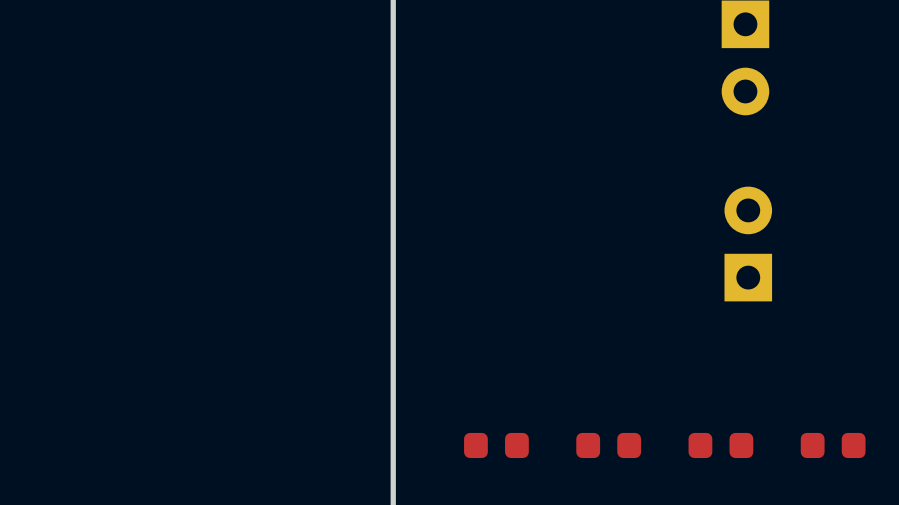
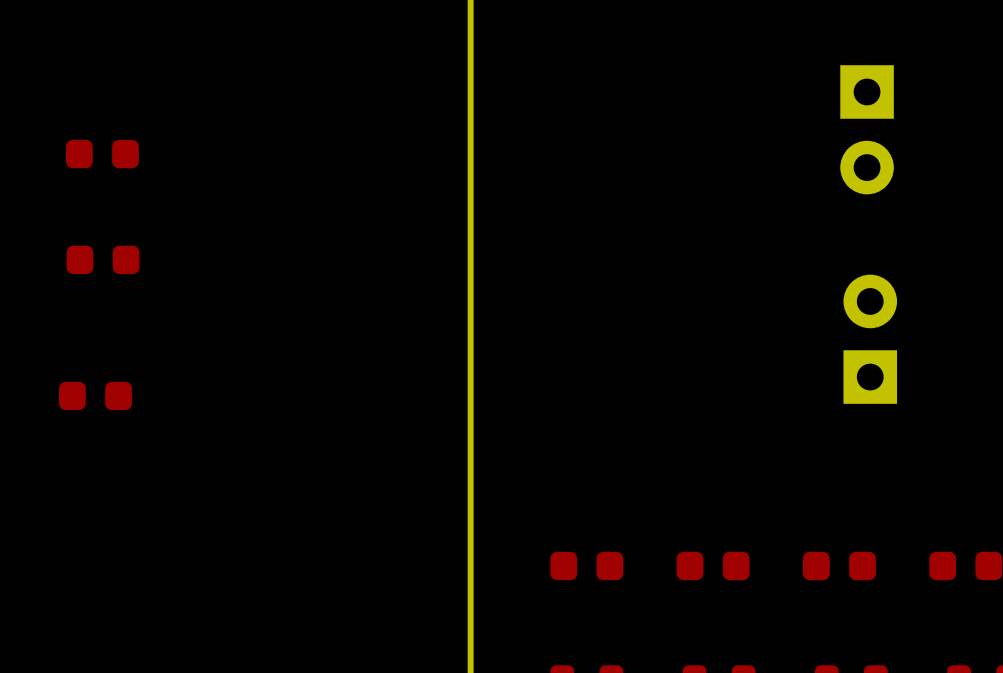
part: none -> (102, 154)
part: none -> (103, 259)
part: none -> (95, 395)

